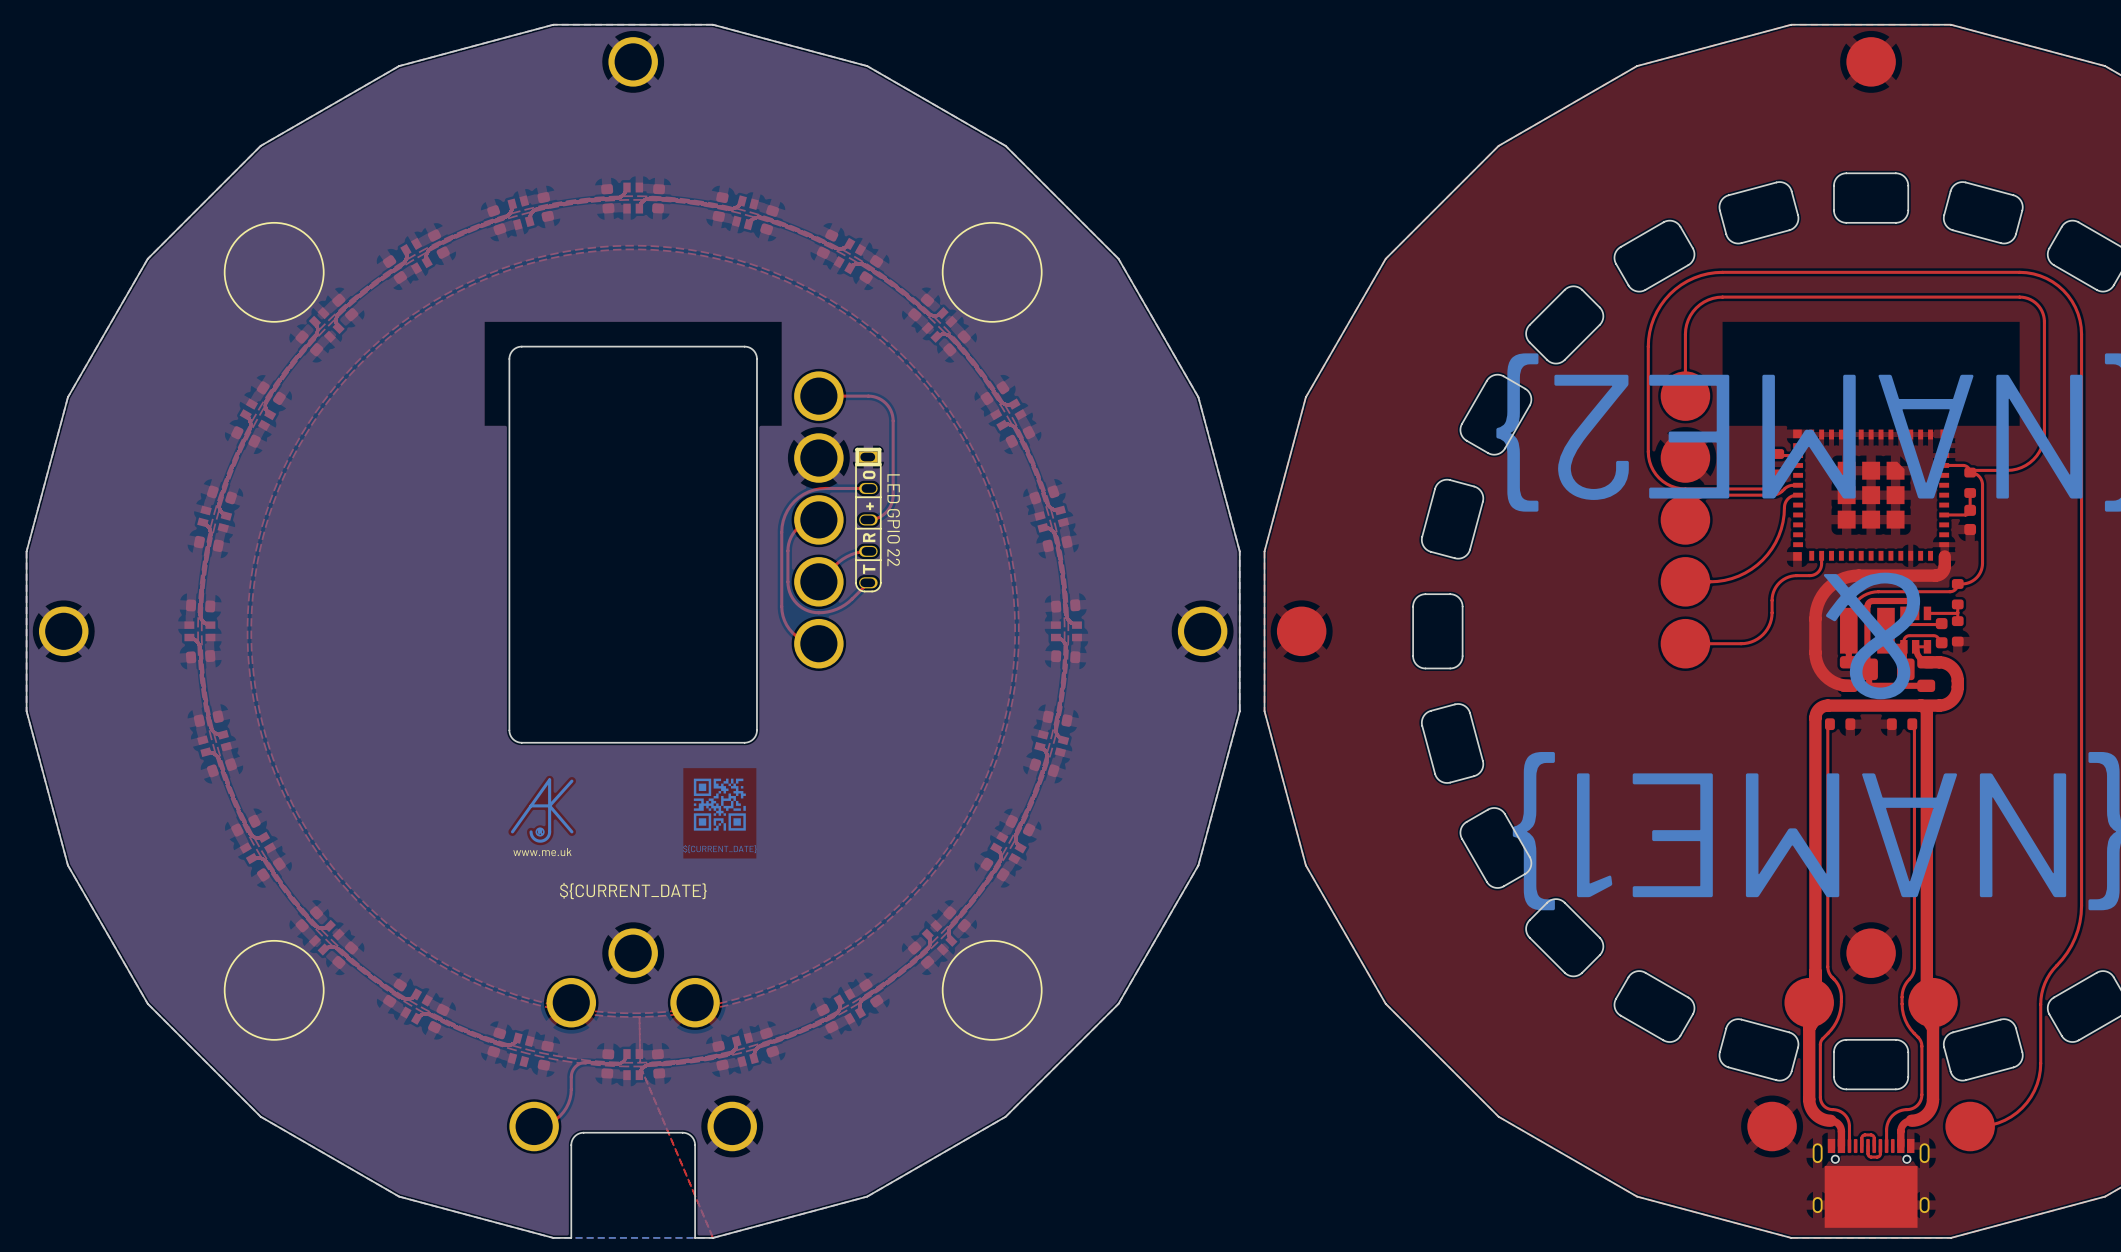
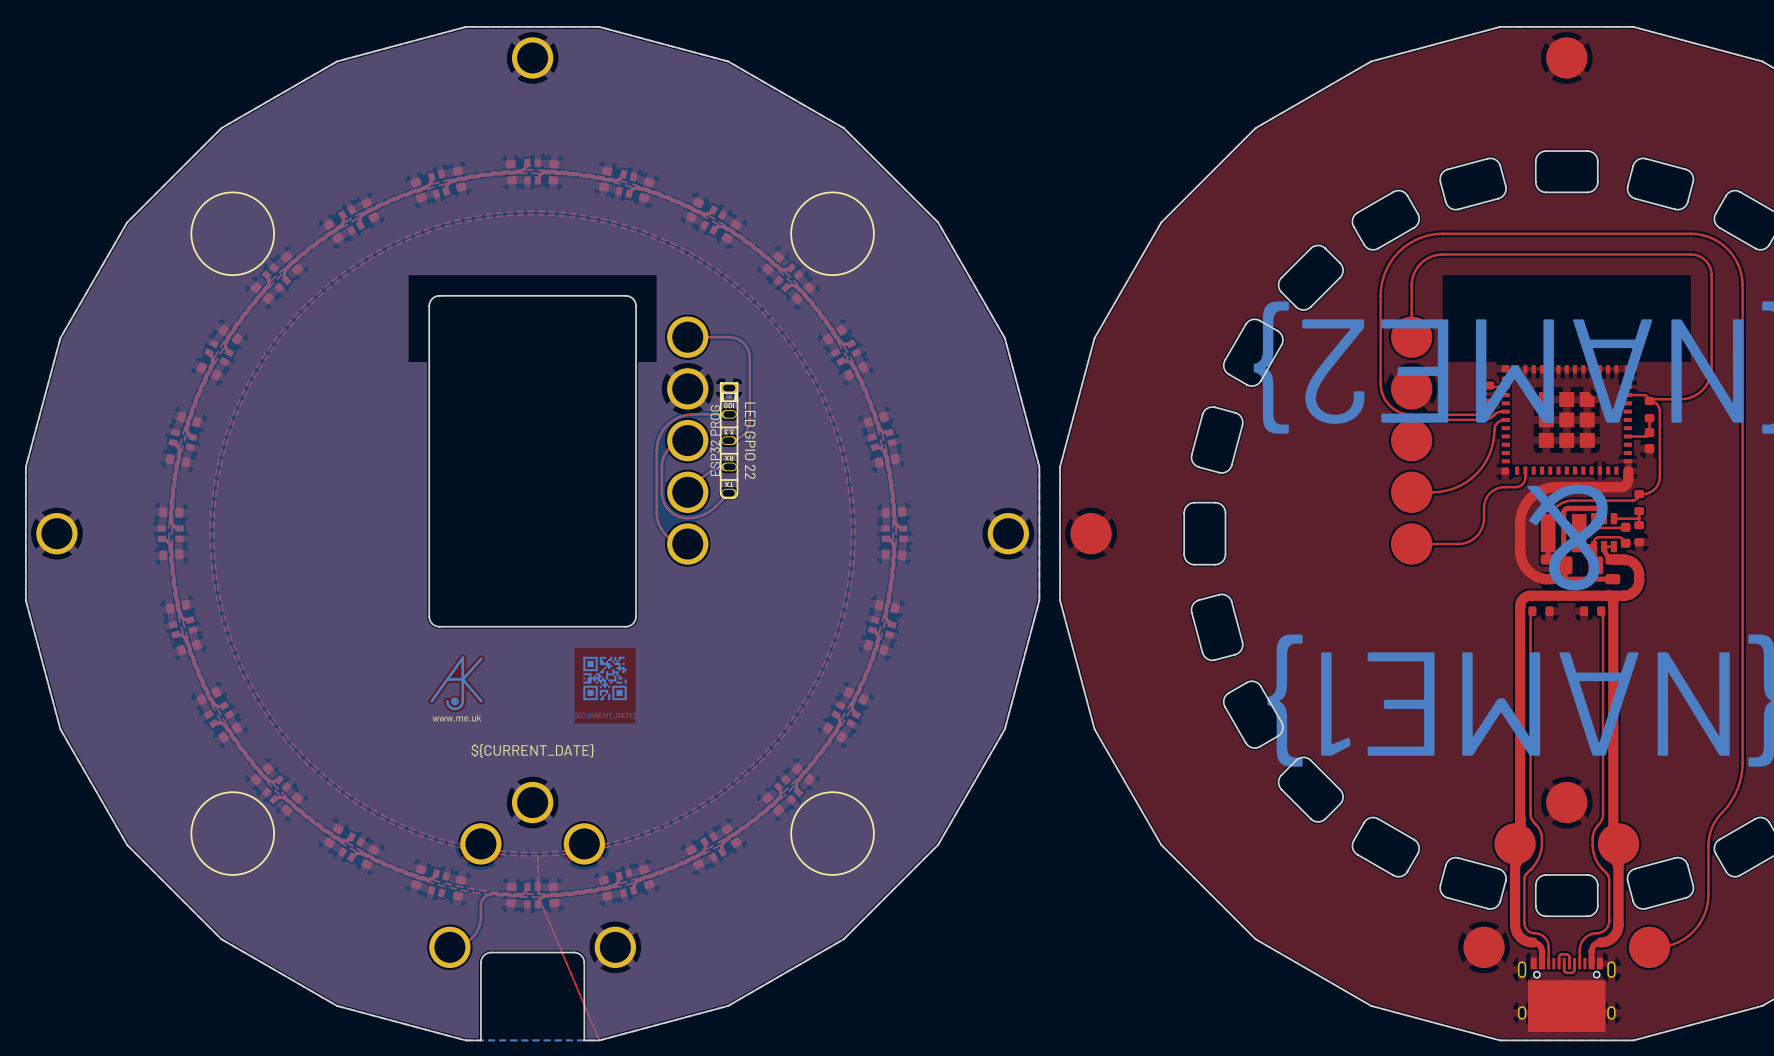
part footprint: [855, 447, 882, 593] -> [720, 382, 739, 499]

